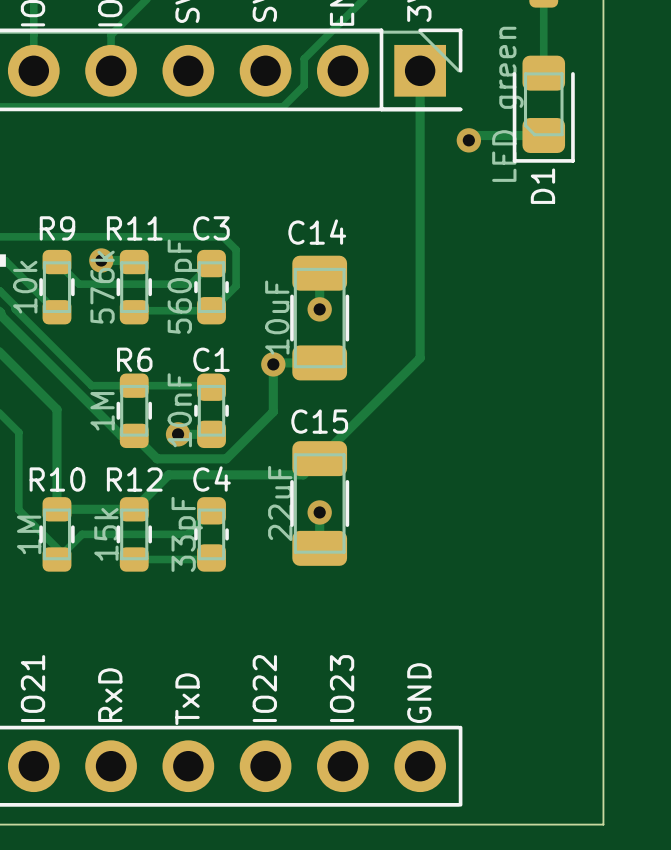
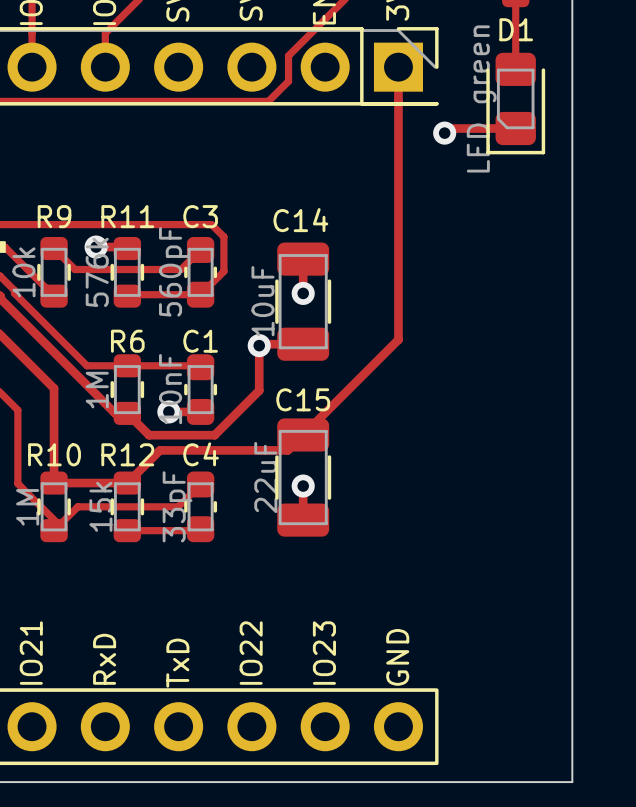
D1 name rotation: 0° (542, 186) -> 90° clockwise (516, 29)
D1 name position: D1 (542, 186) -> D1 (516, 29)

